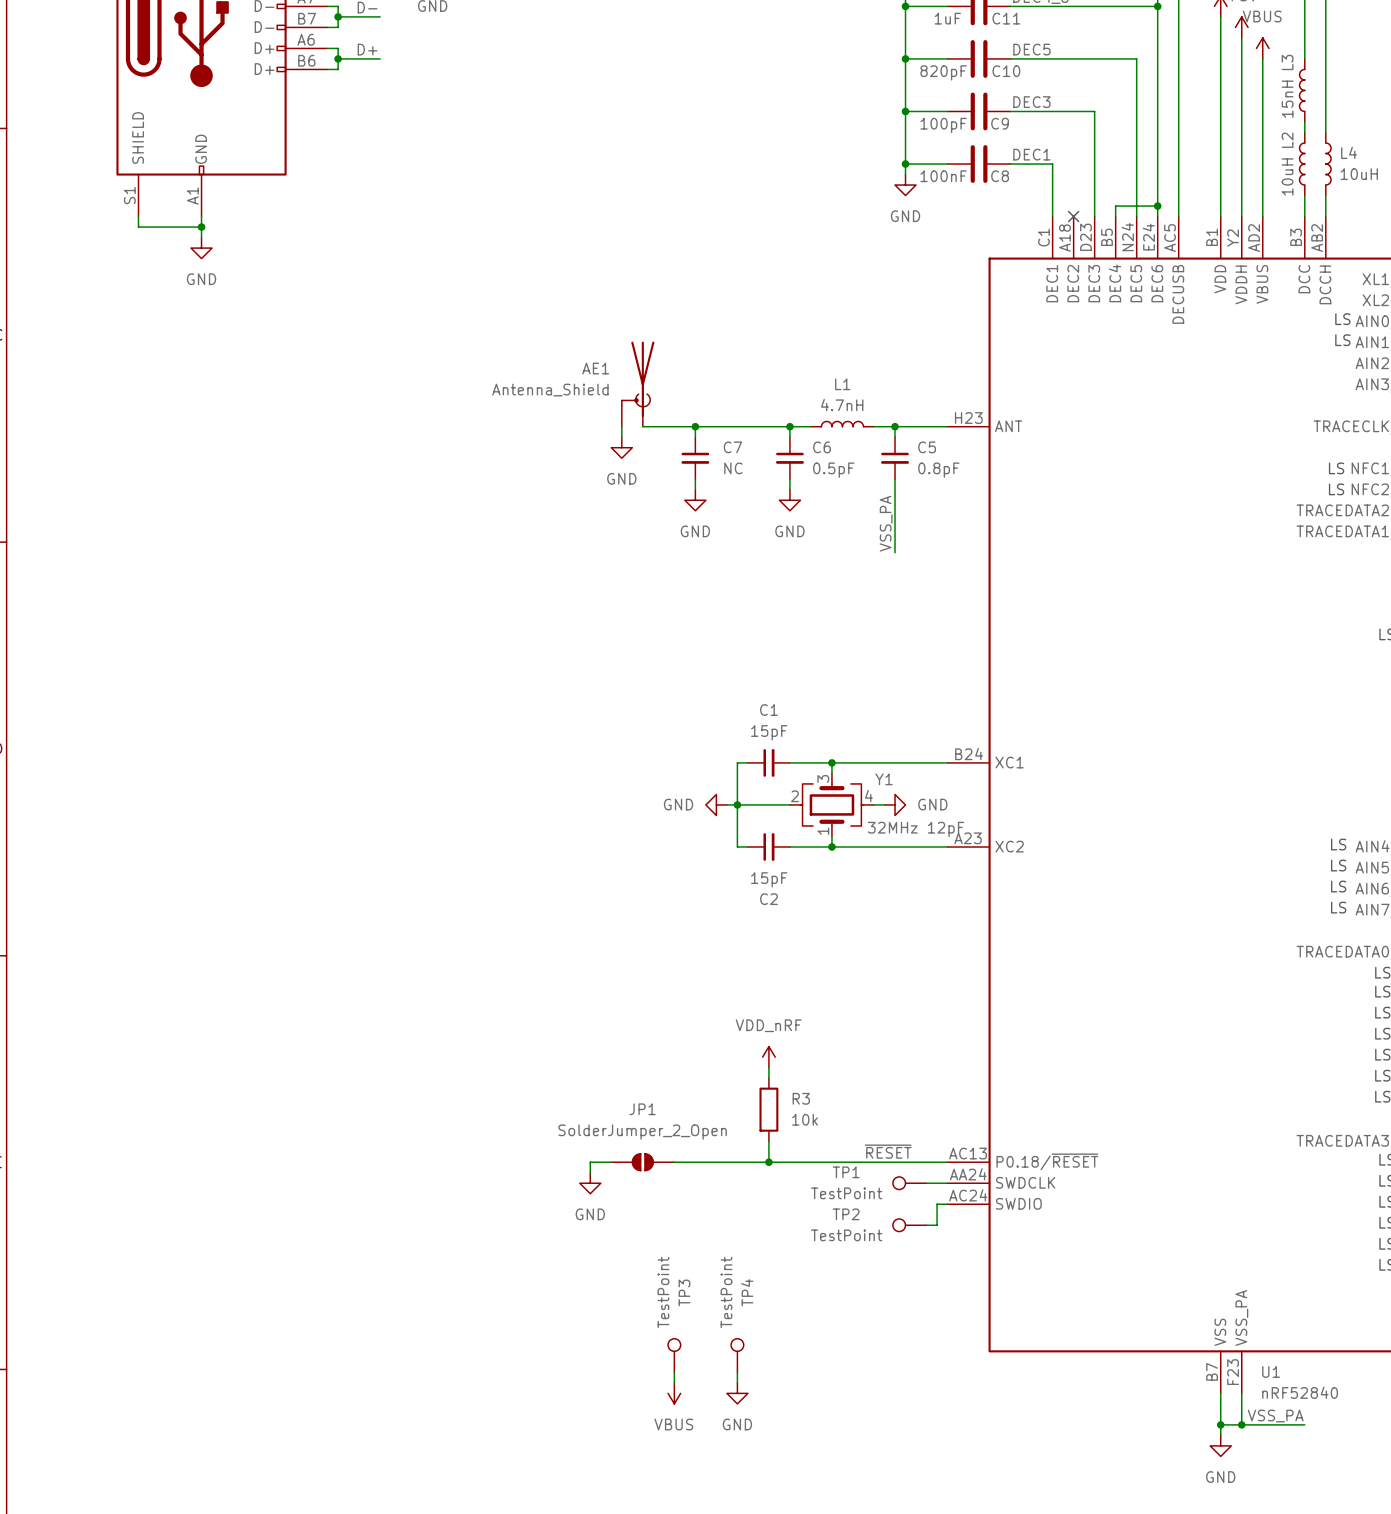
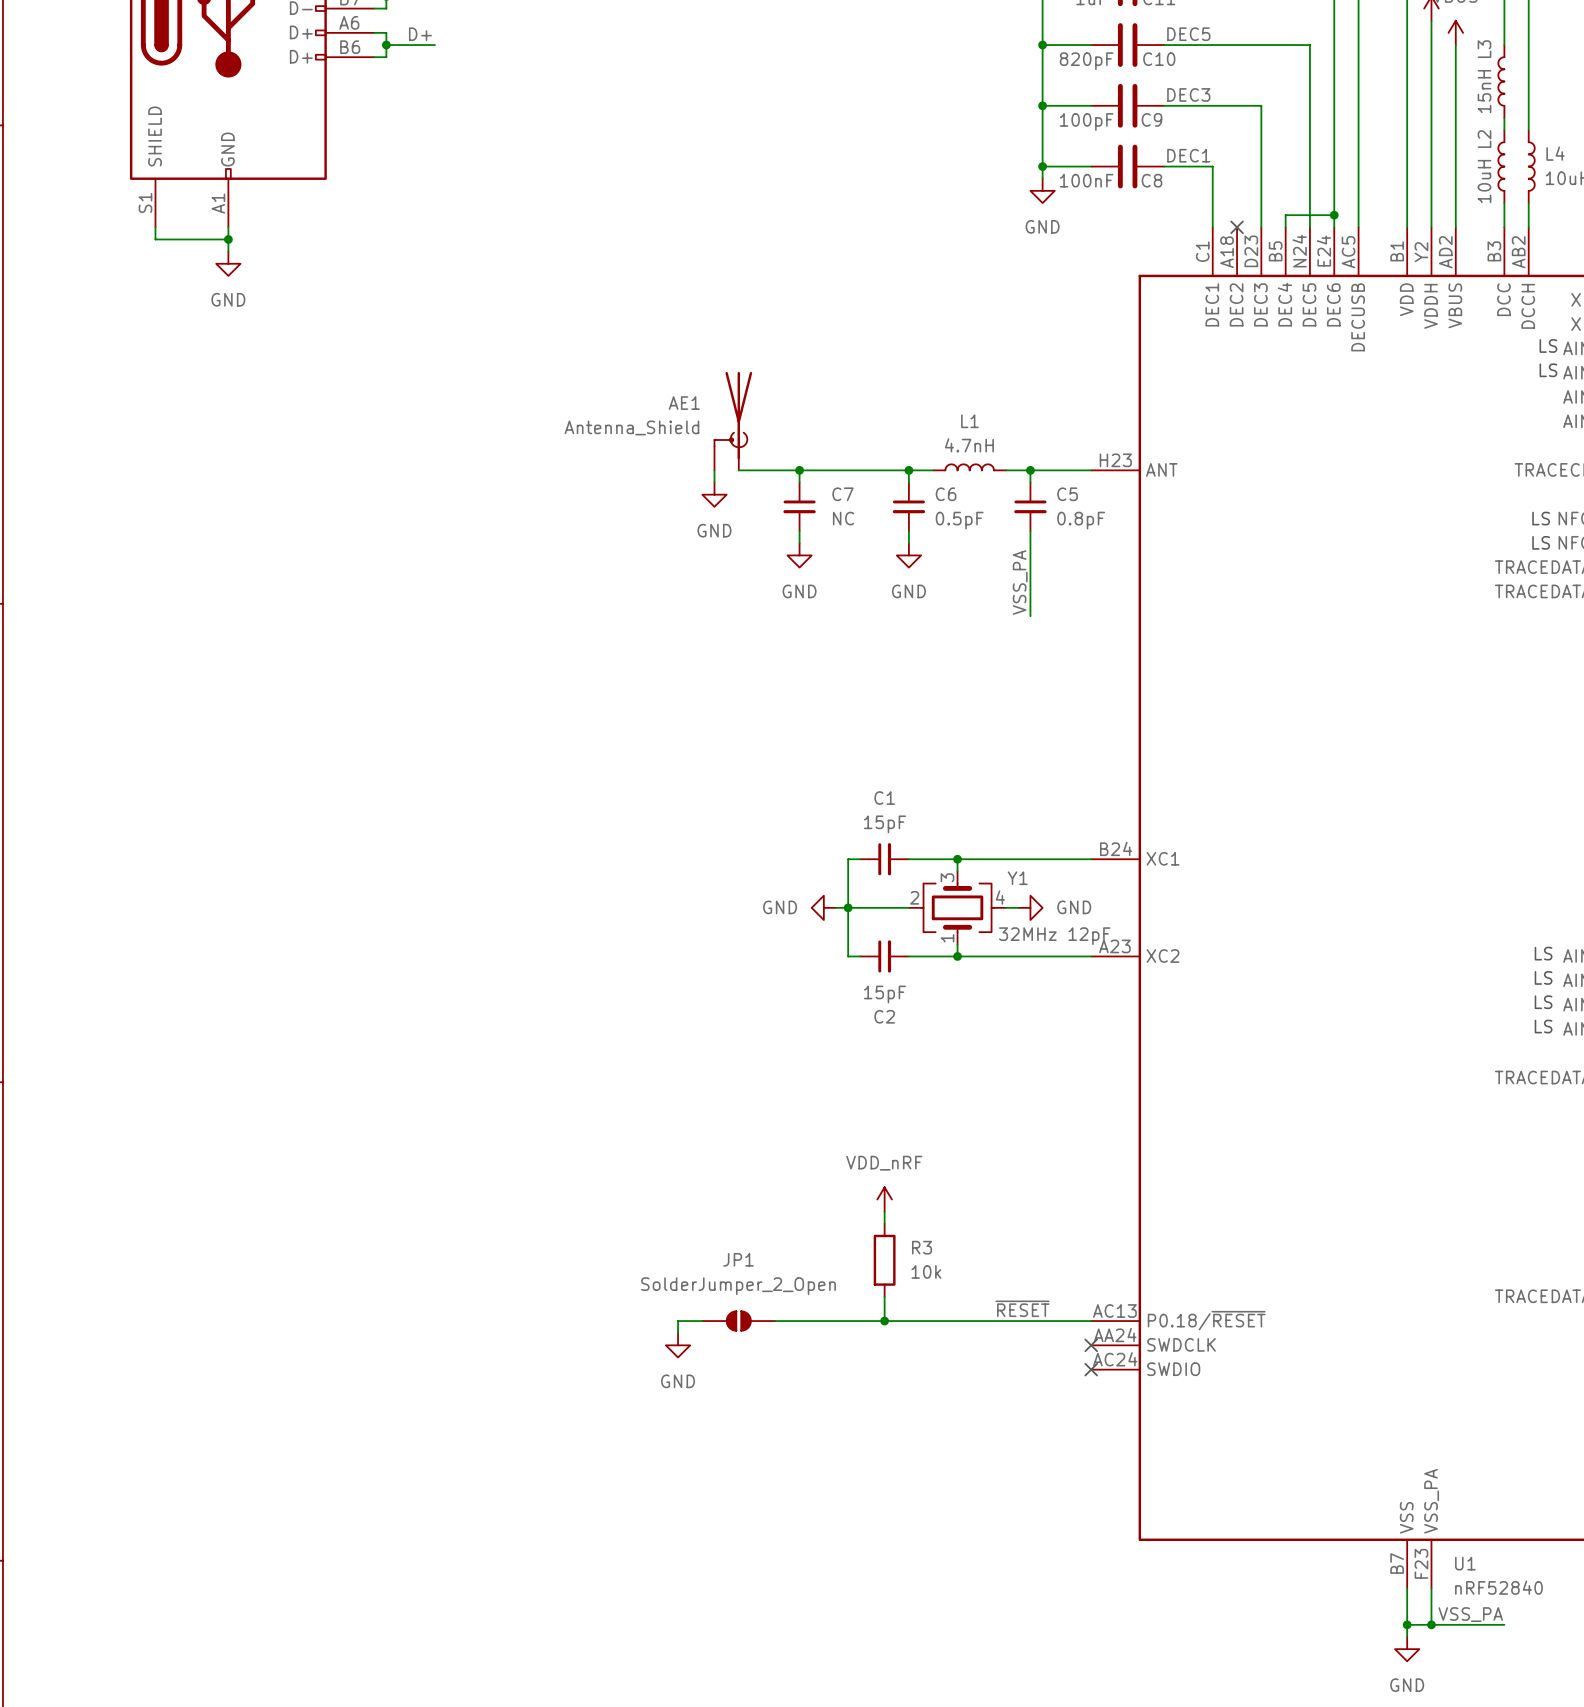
TP1: TestPoint (909, 1183) -> none
wire: (926, 1183) (947, 1183) -> none
no-connect mark: none -> (1091, 1345)
wire: (947, 1204) (937, 1204) (937, 1225) (926, 1225) -> none
no-connect mark: none -> (1091, 1369)
TP2: TestPoint (909, 1225) -> none
TP3: TestPoint (674, 1355) -> none
TP4: TestPoint (737, 1355) -> none
wire: (674, 1372) (674, 1382) -> none
wire: (737, 1372) (737, 1382) -> none
power symbol: VBUS (674, 1393) -> none
power symbol: GND (737, 1393) -> none

